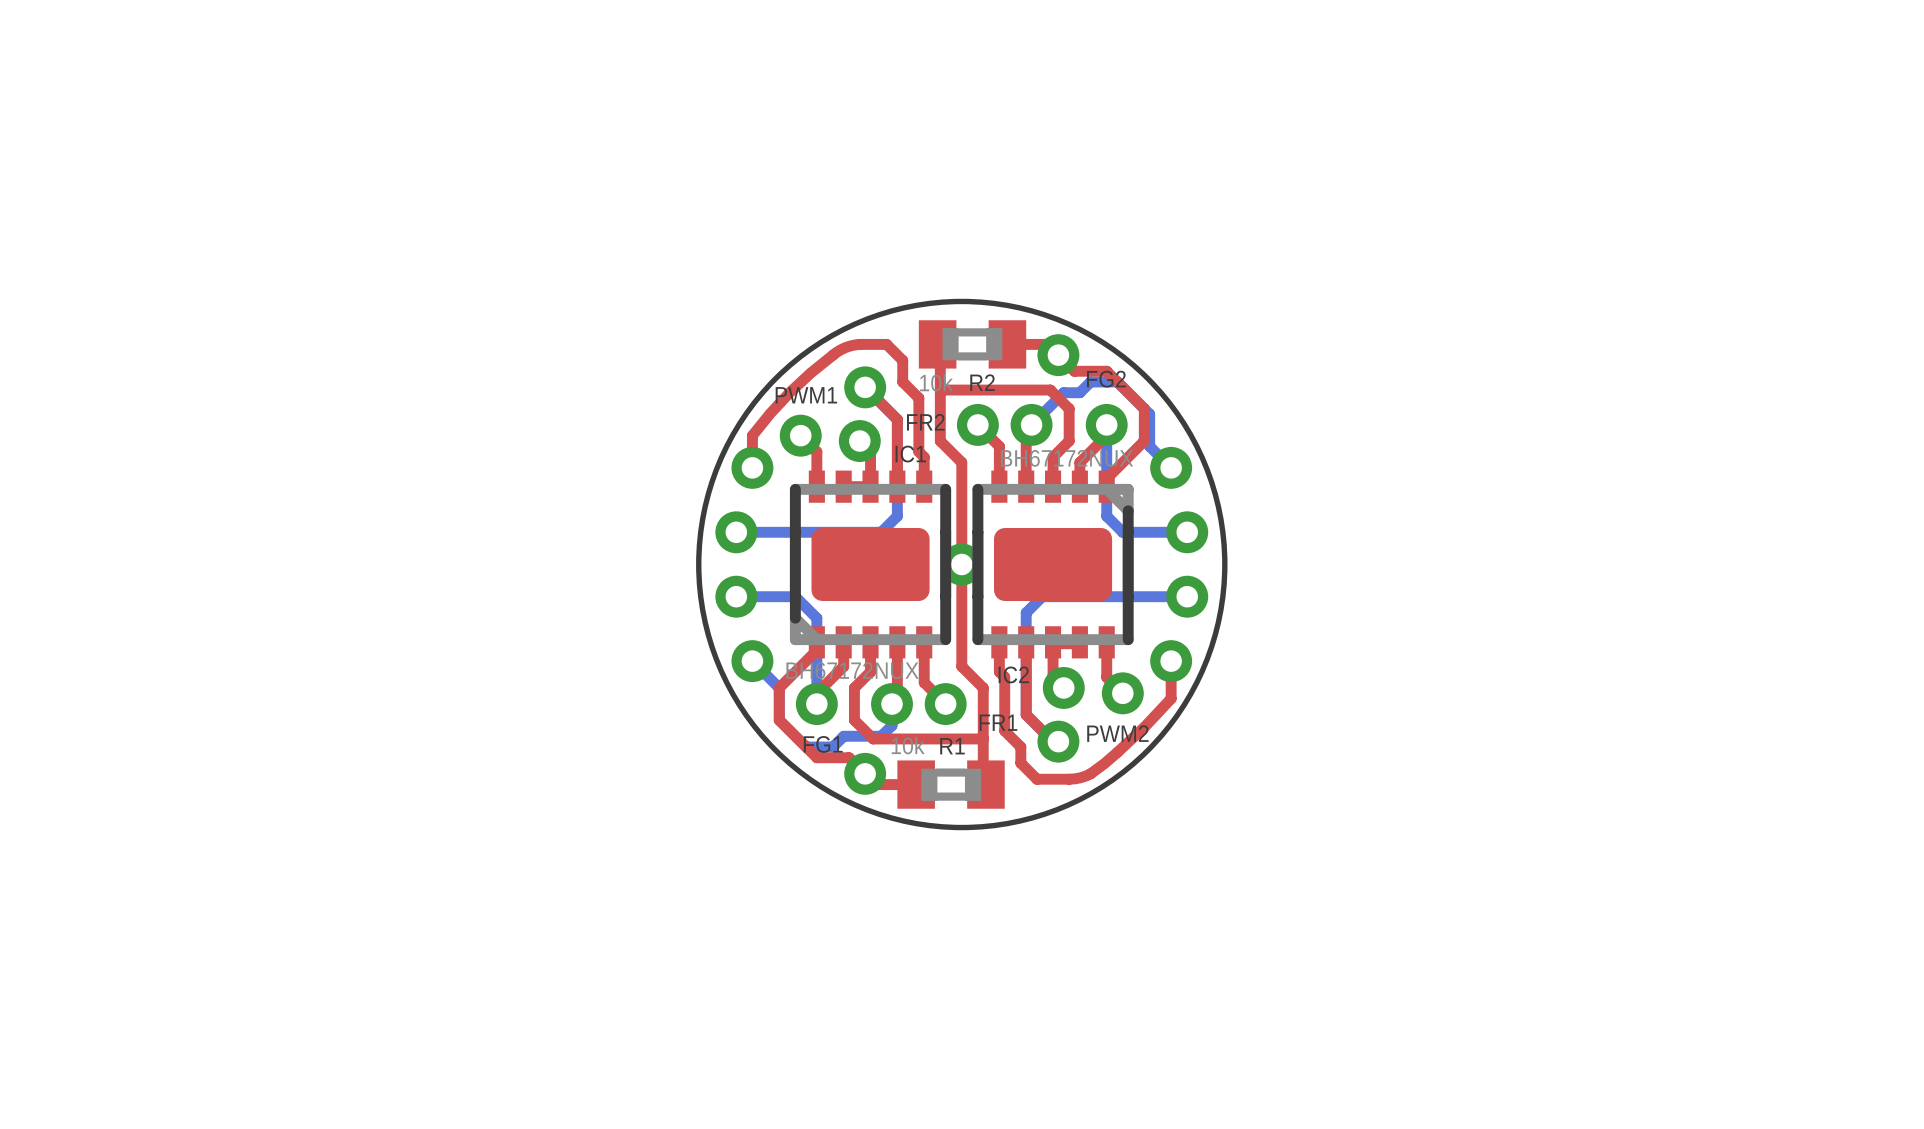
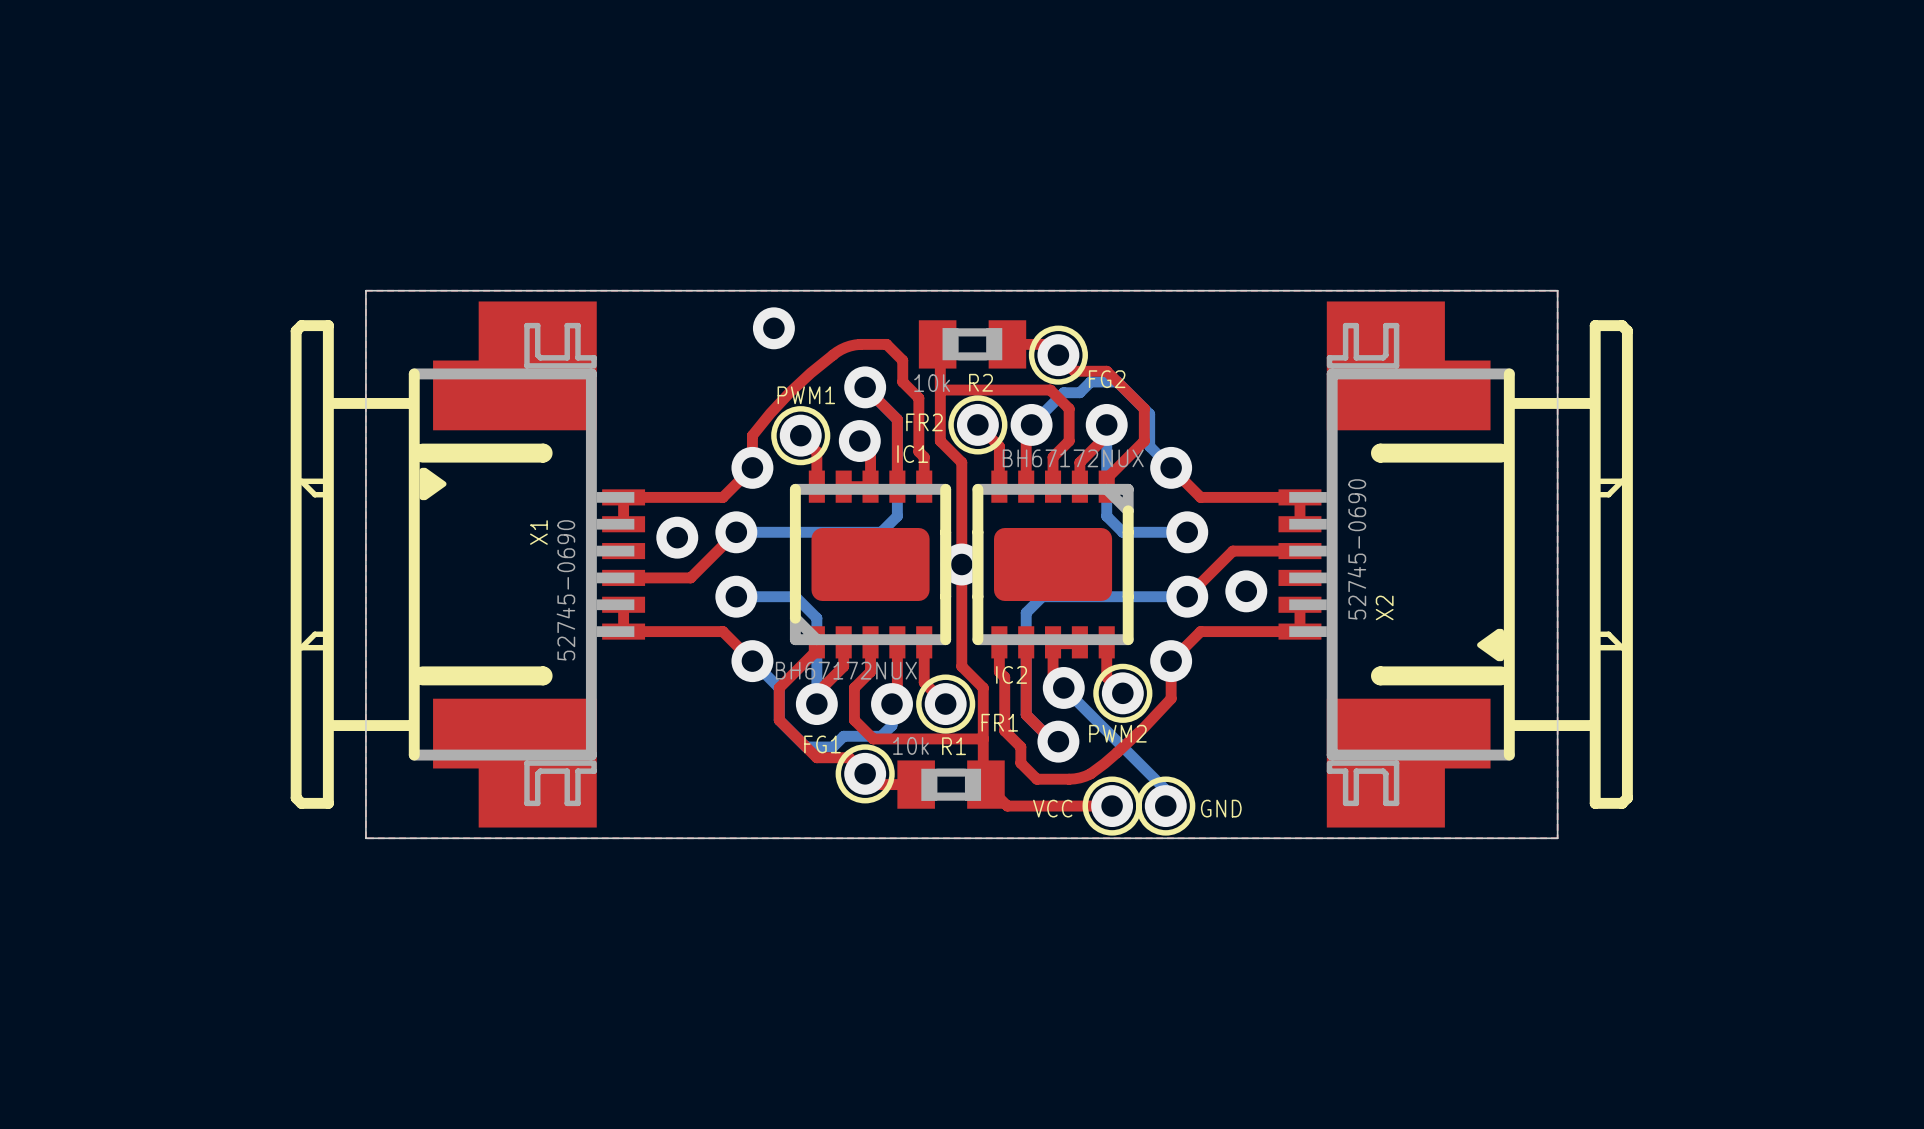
board edge: none -> (365, 290) (1557, 290) (1557, 838) (365, 838) (365, 290)
drawing: [696, 298, 1228, 831] -> none
drawing: none -> [948, 325, 1088, 455]
via: none -> (773, 328)
drawing: none -> [771, 406, 831, 466]
top track: none -> (752, 467) (722, 497) (623, 497) (623, 524)
top track: none -> (1171, 467) (1200, 497) (1299, 497) (1299, 524)
top track: none -> (736, 532) (690, 577) (623, 577)
via: none -> (677, 537)
top track: none -> (1299, 551) (1232, 551) (1187, 596)
X1: none -> 52745-0690 (467, 564)
X2: none -> 52745-0690 (1455, 564)
via: none -> (1246, 591)
top track: none -> (623, 604) (623, 631) (722, 631) (752, 661)
top track: none -> (1299, 604) (1299, 631) (1200, 631) (1171, 661)
drawing: none -> [1082, 663, 1196, 836]
drawing: none -> [835, 674, 976, 804]
bottom track: none -> (1063, 687) (1165, 789) (1165, 806)
top track: none -> (985, 784) (1007, 806) (1112, 806)
via: none -> (1112, 806)
via: none -> (1165, 806)
text: none -> VCC (1052, 808)
text: none -> GND (1221, 808)

